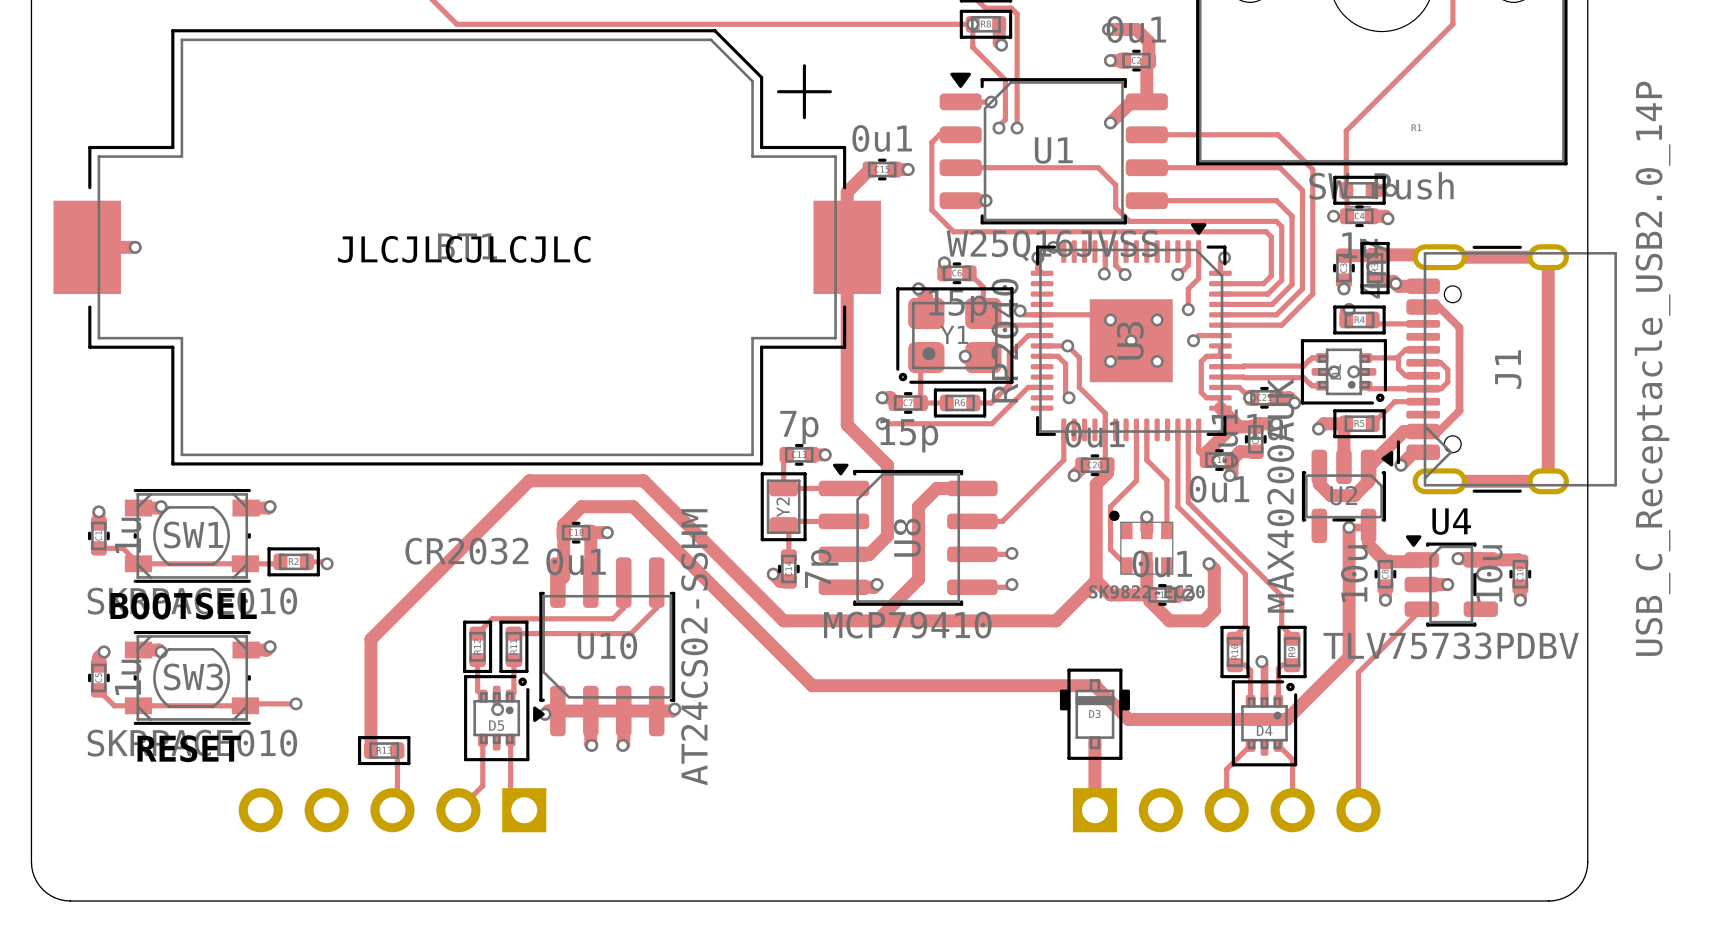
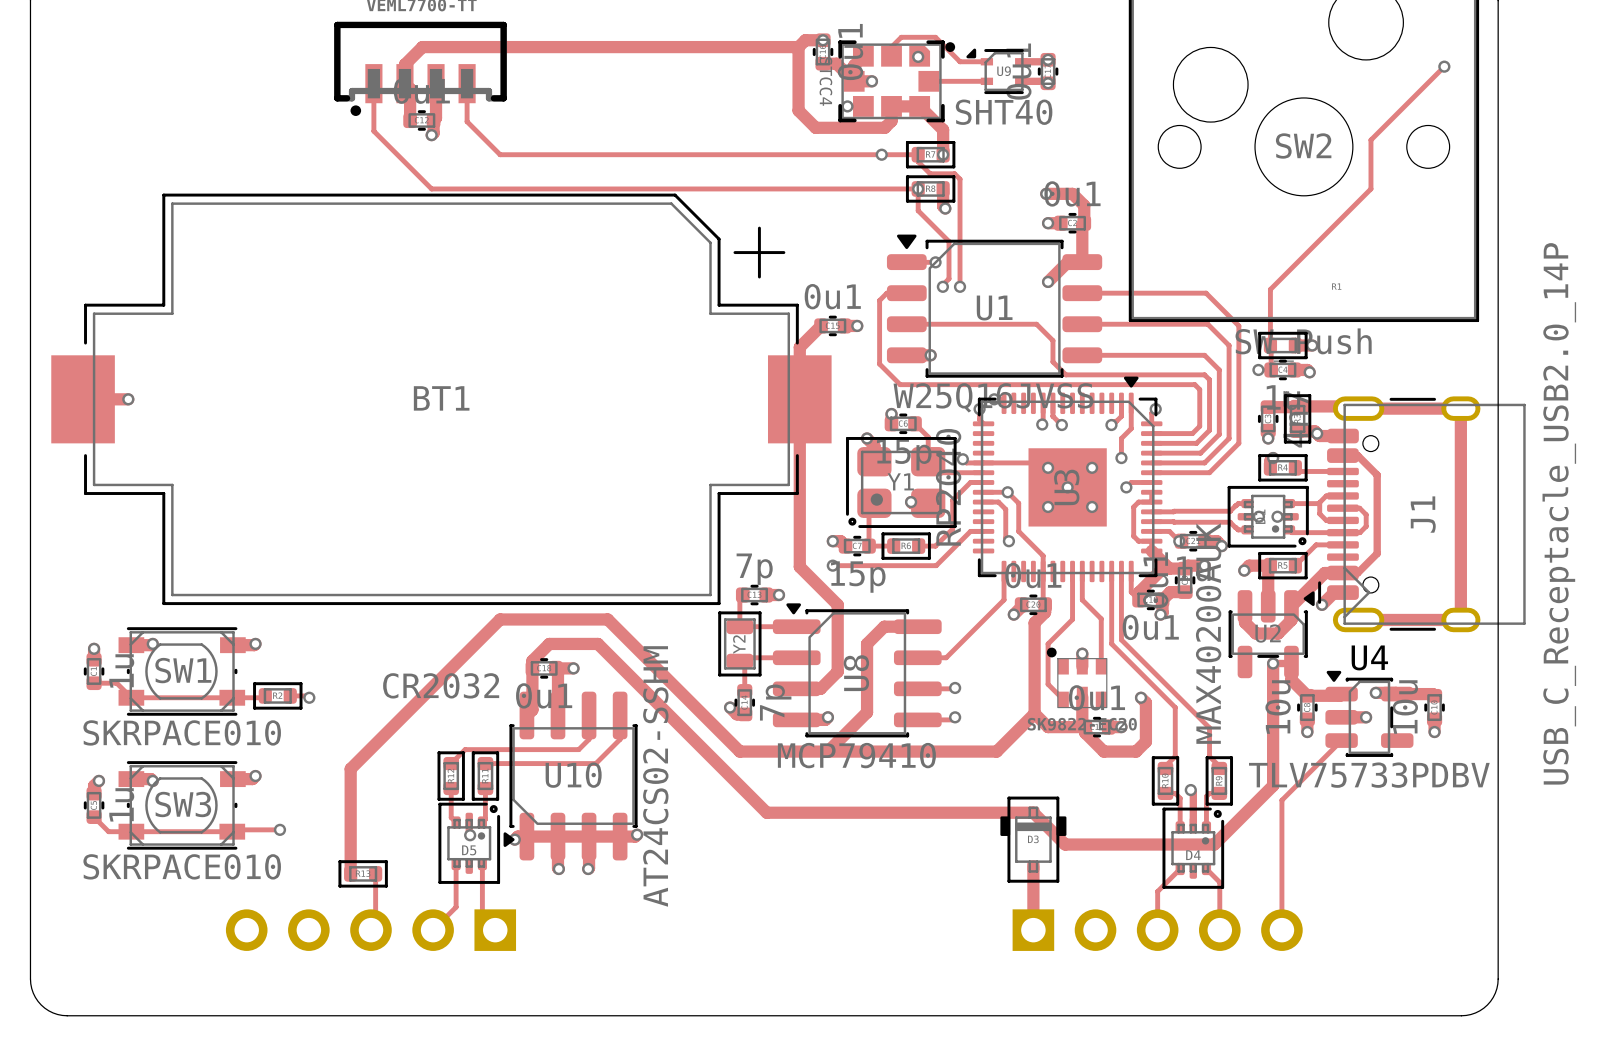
text: JLCJLCJLCJLC (464, 249) -> none
text: BOOTSEL (183, 606) -> none
text: RESET (189, 748) -> none

